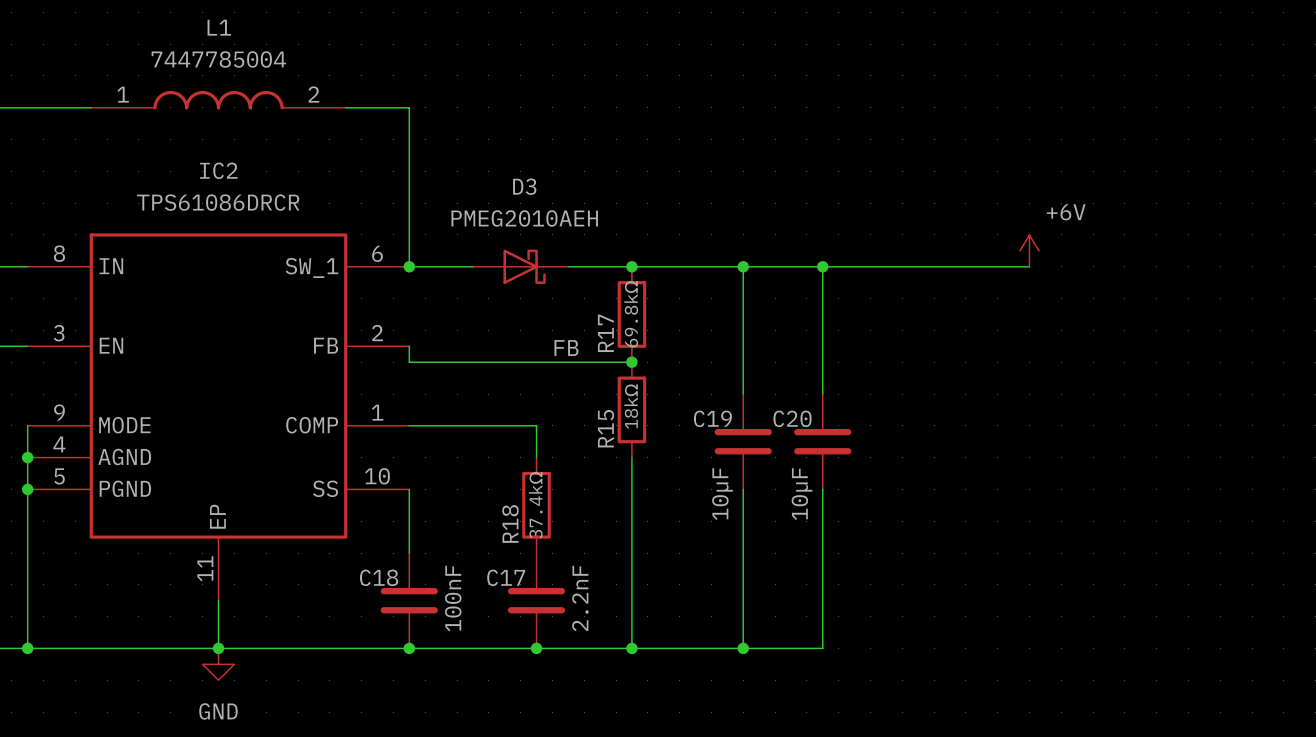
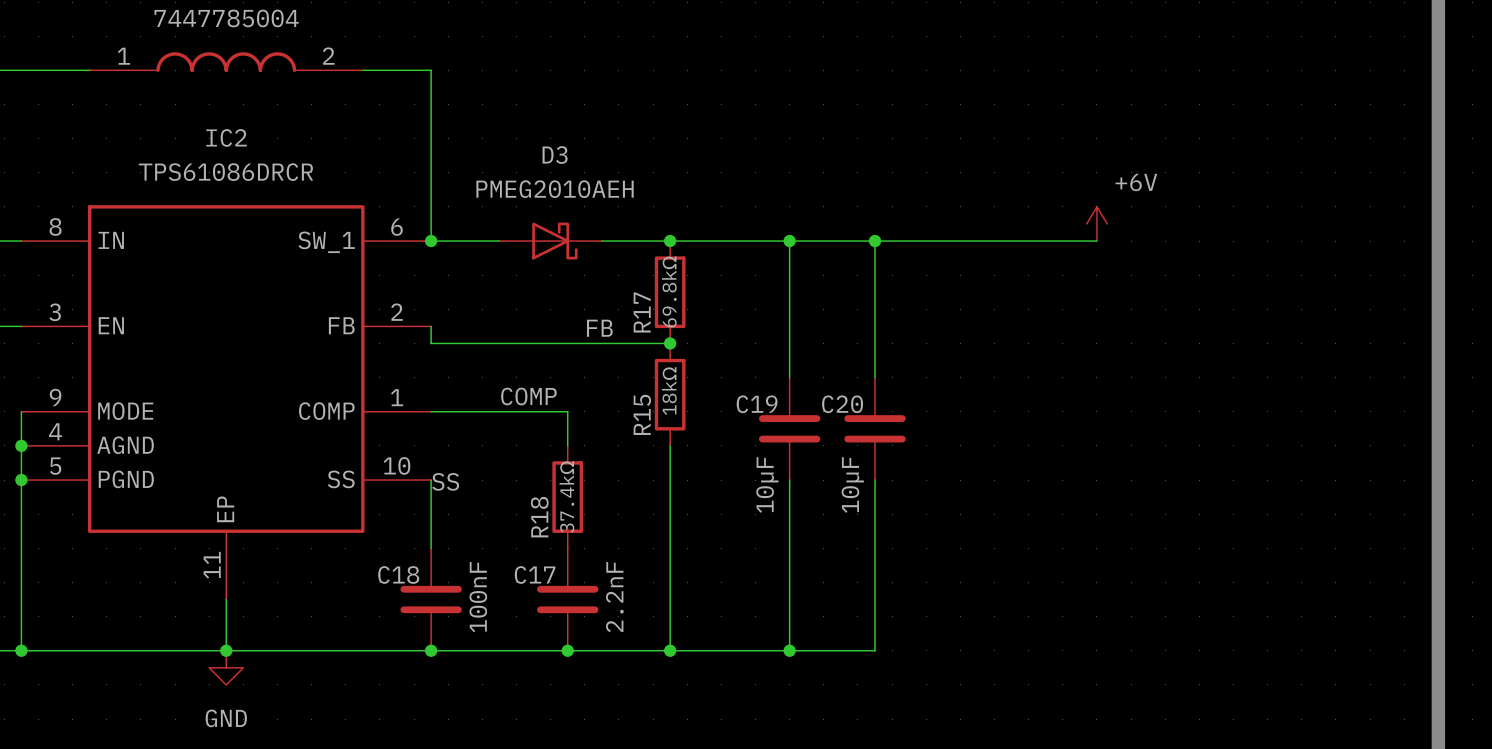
label: none -> COMP (528, 396)
label: none -> SS (445, 481)

